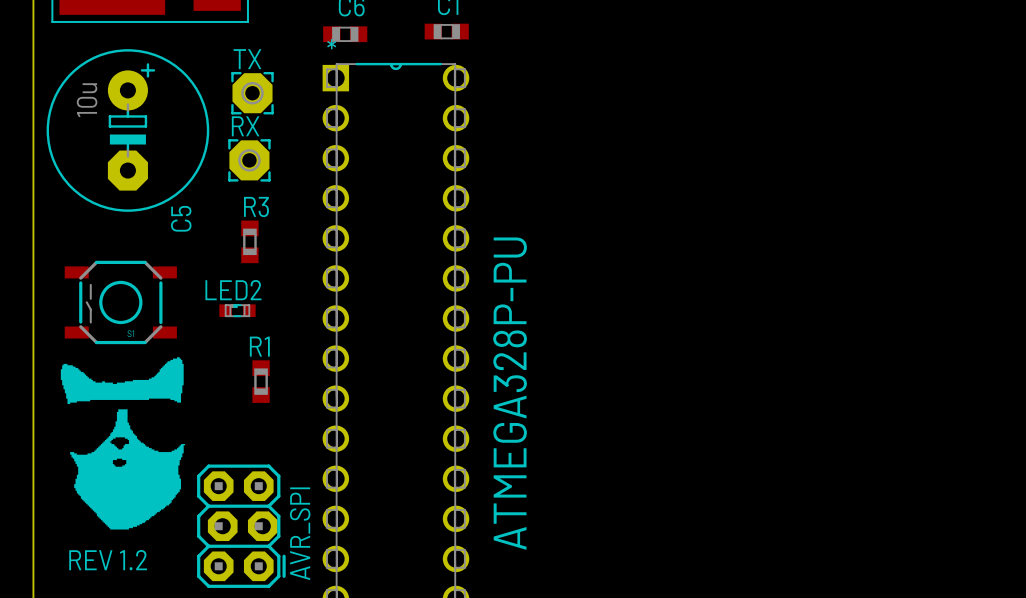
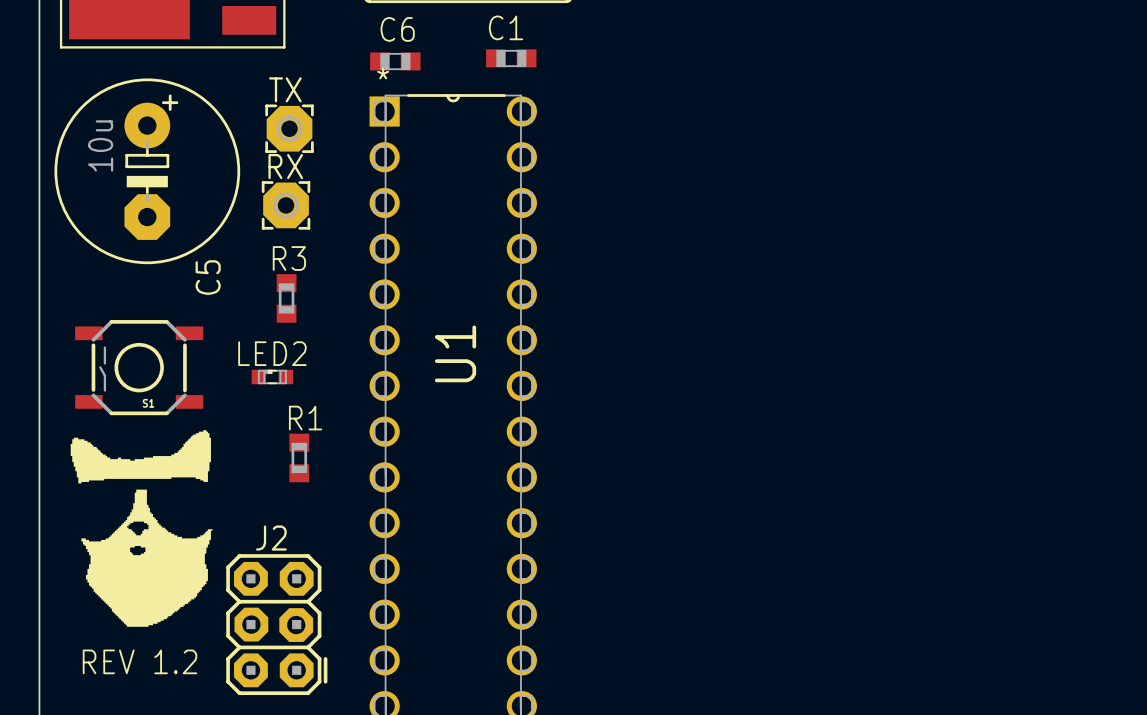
ATMEGA328P-PU name: ATMEGA328P-PU (510, 393) -> U1 (455, 353)
AVR_SPI: (241, 526) -> none
J2: none -> (276, 624)

